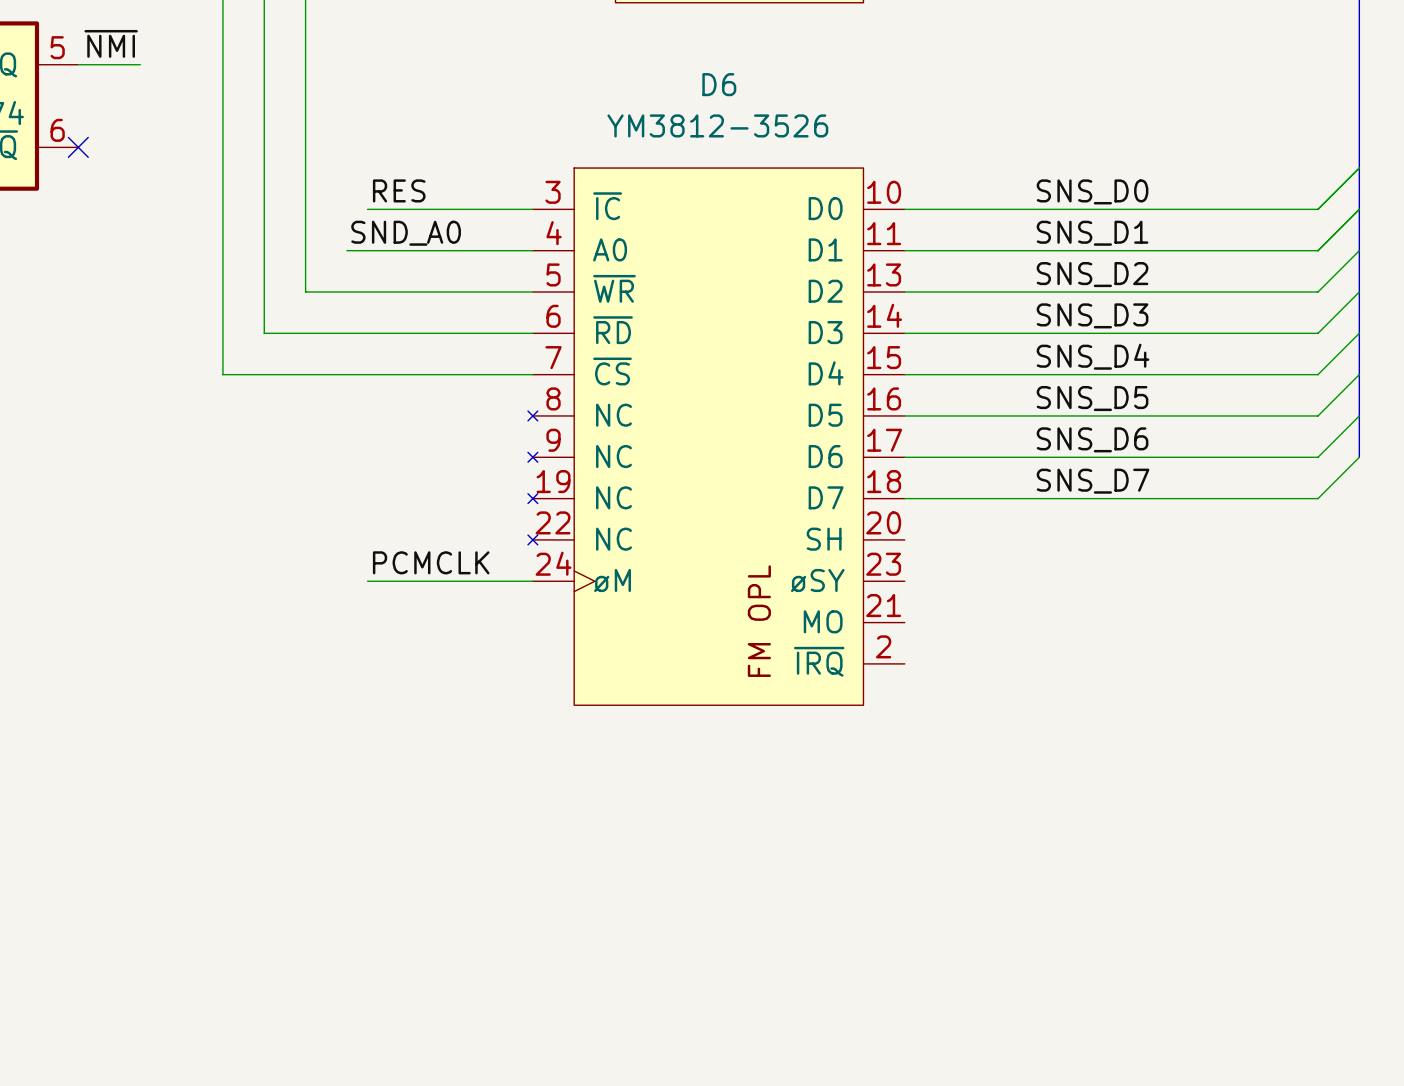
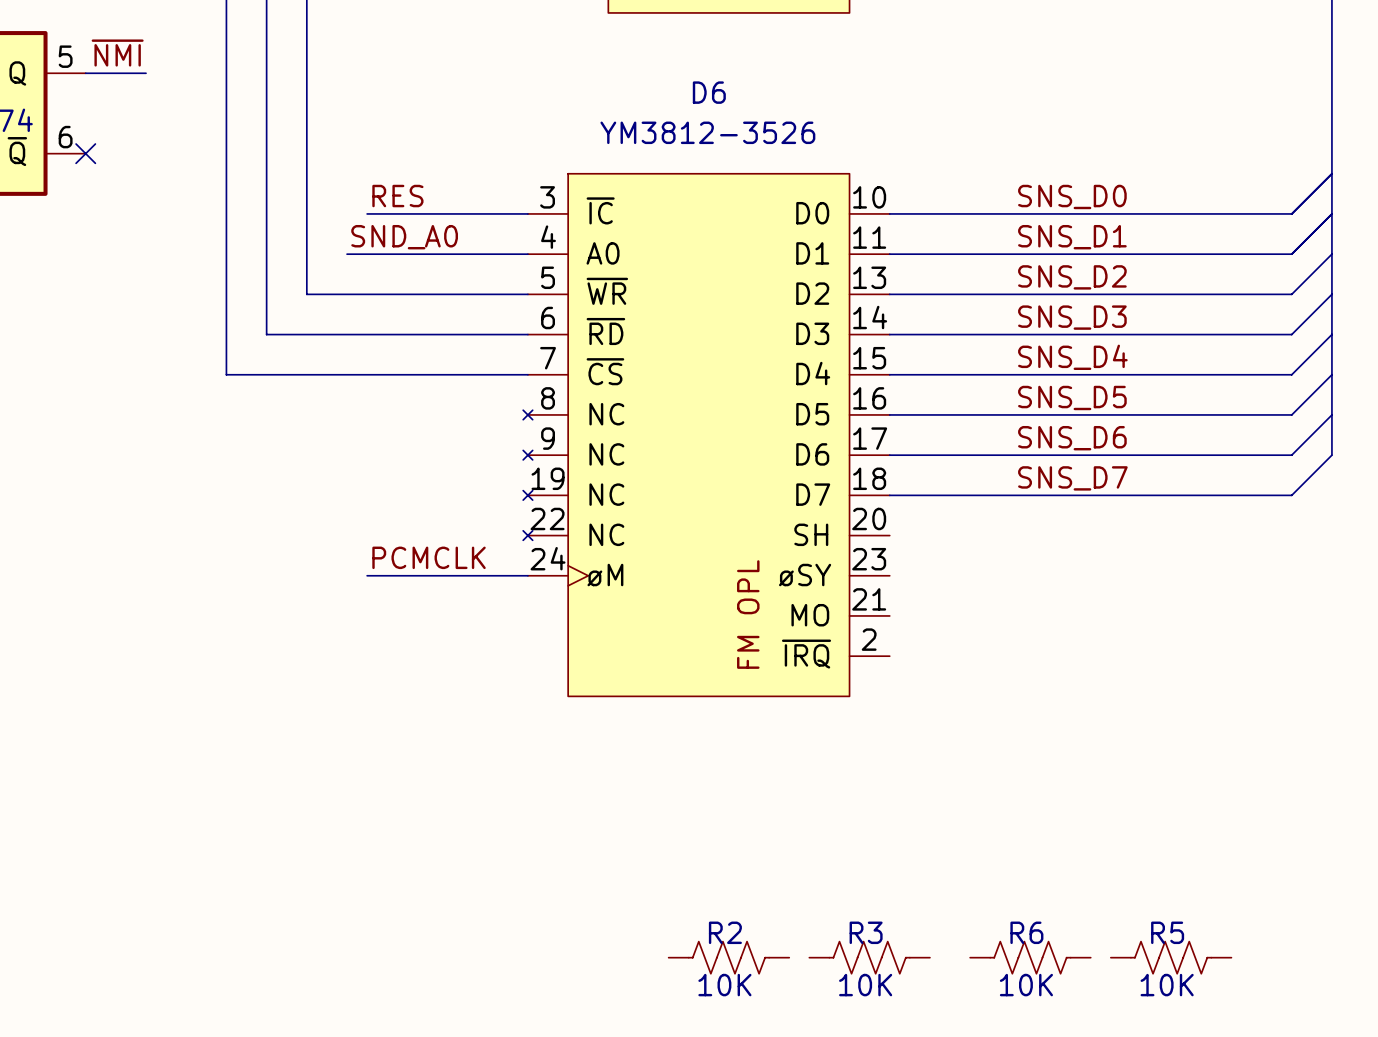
R2: none -> 10K (728, 957)
R3: none -> 10K (869, 957)
R6: none -> 10K (1030, 957)
R5: none -> 10K (1171, 957)

